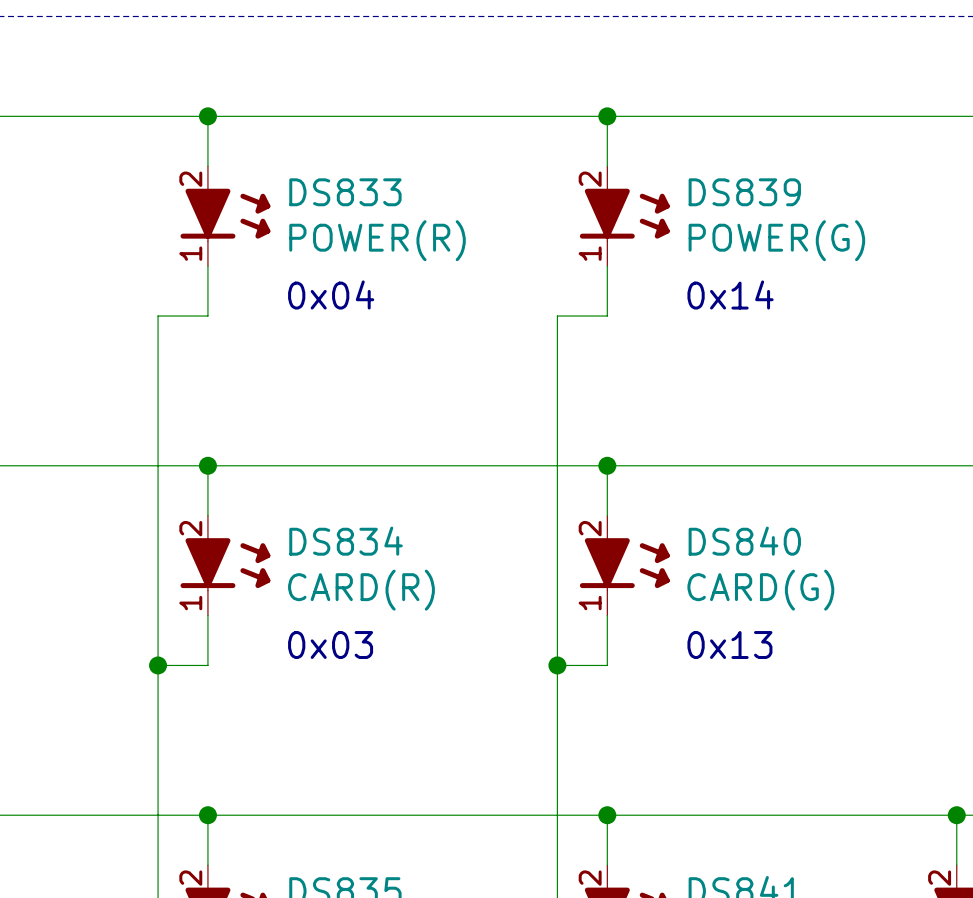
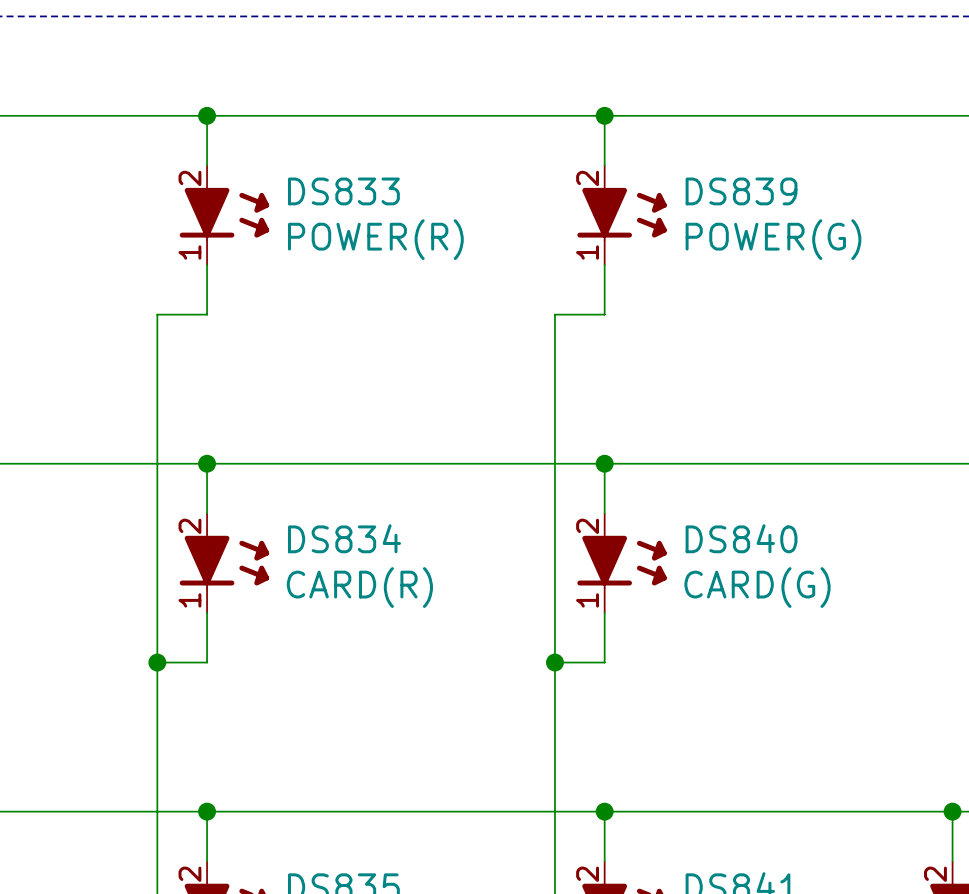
text: 0x04 (331, 294) -> none
text: 0x14 (730, 294) -> none
text: 0x03 (330, 645) -> none
text: 0x13 (729, 645) -> none

